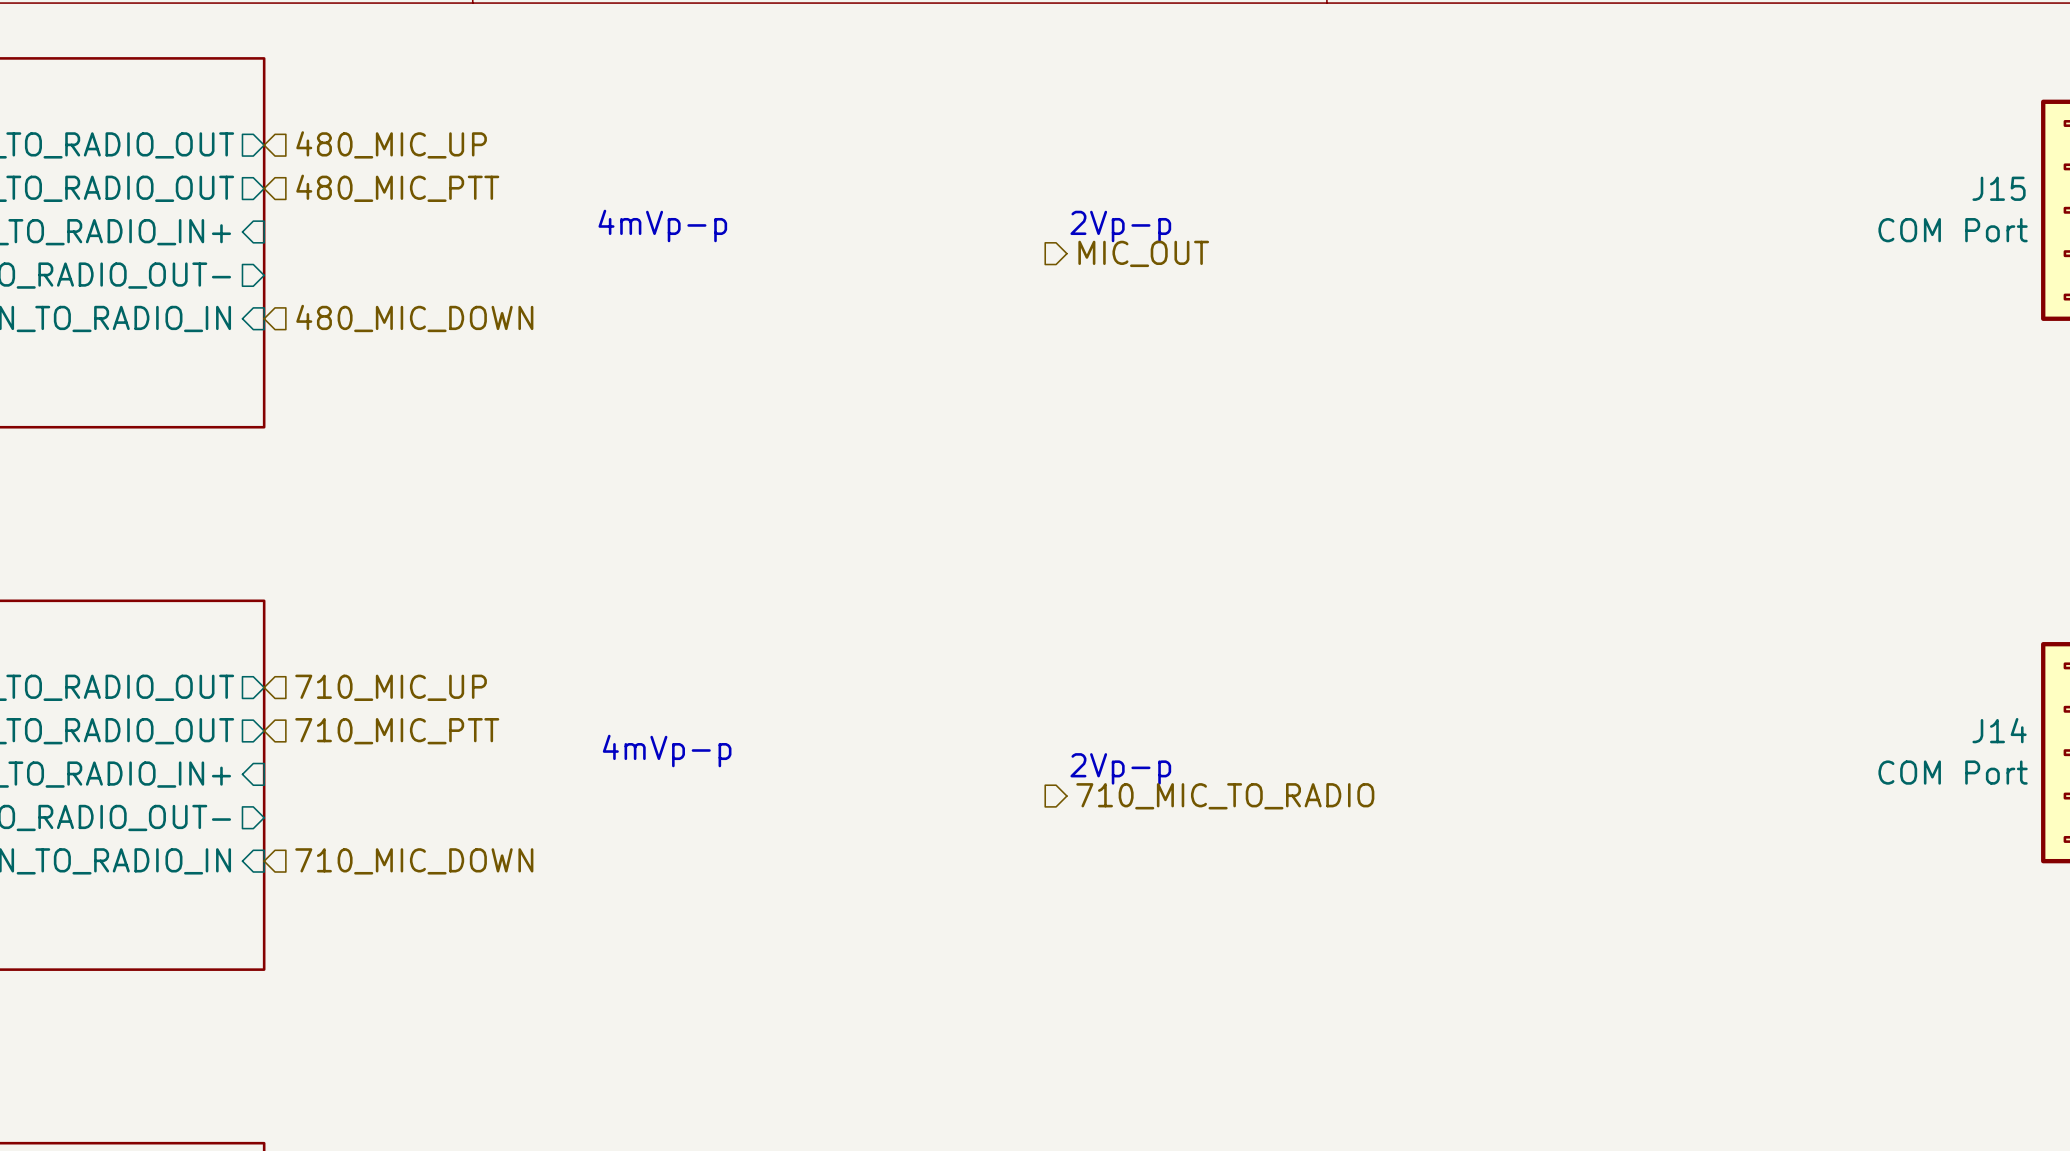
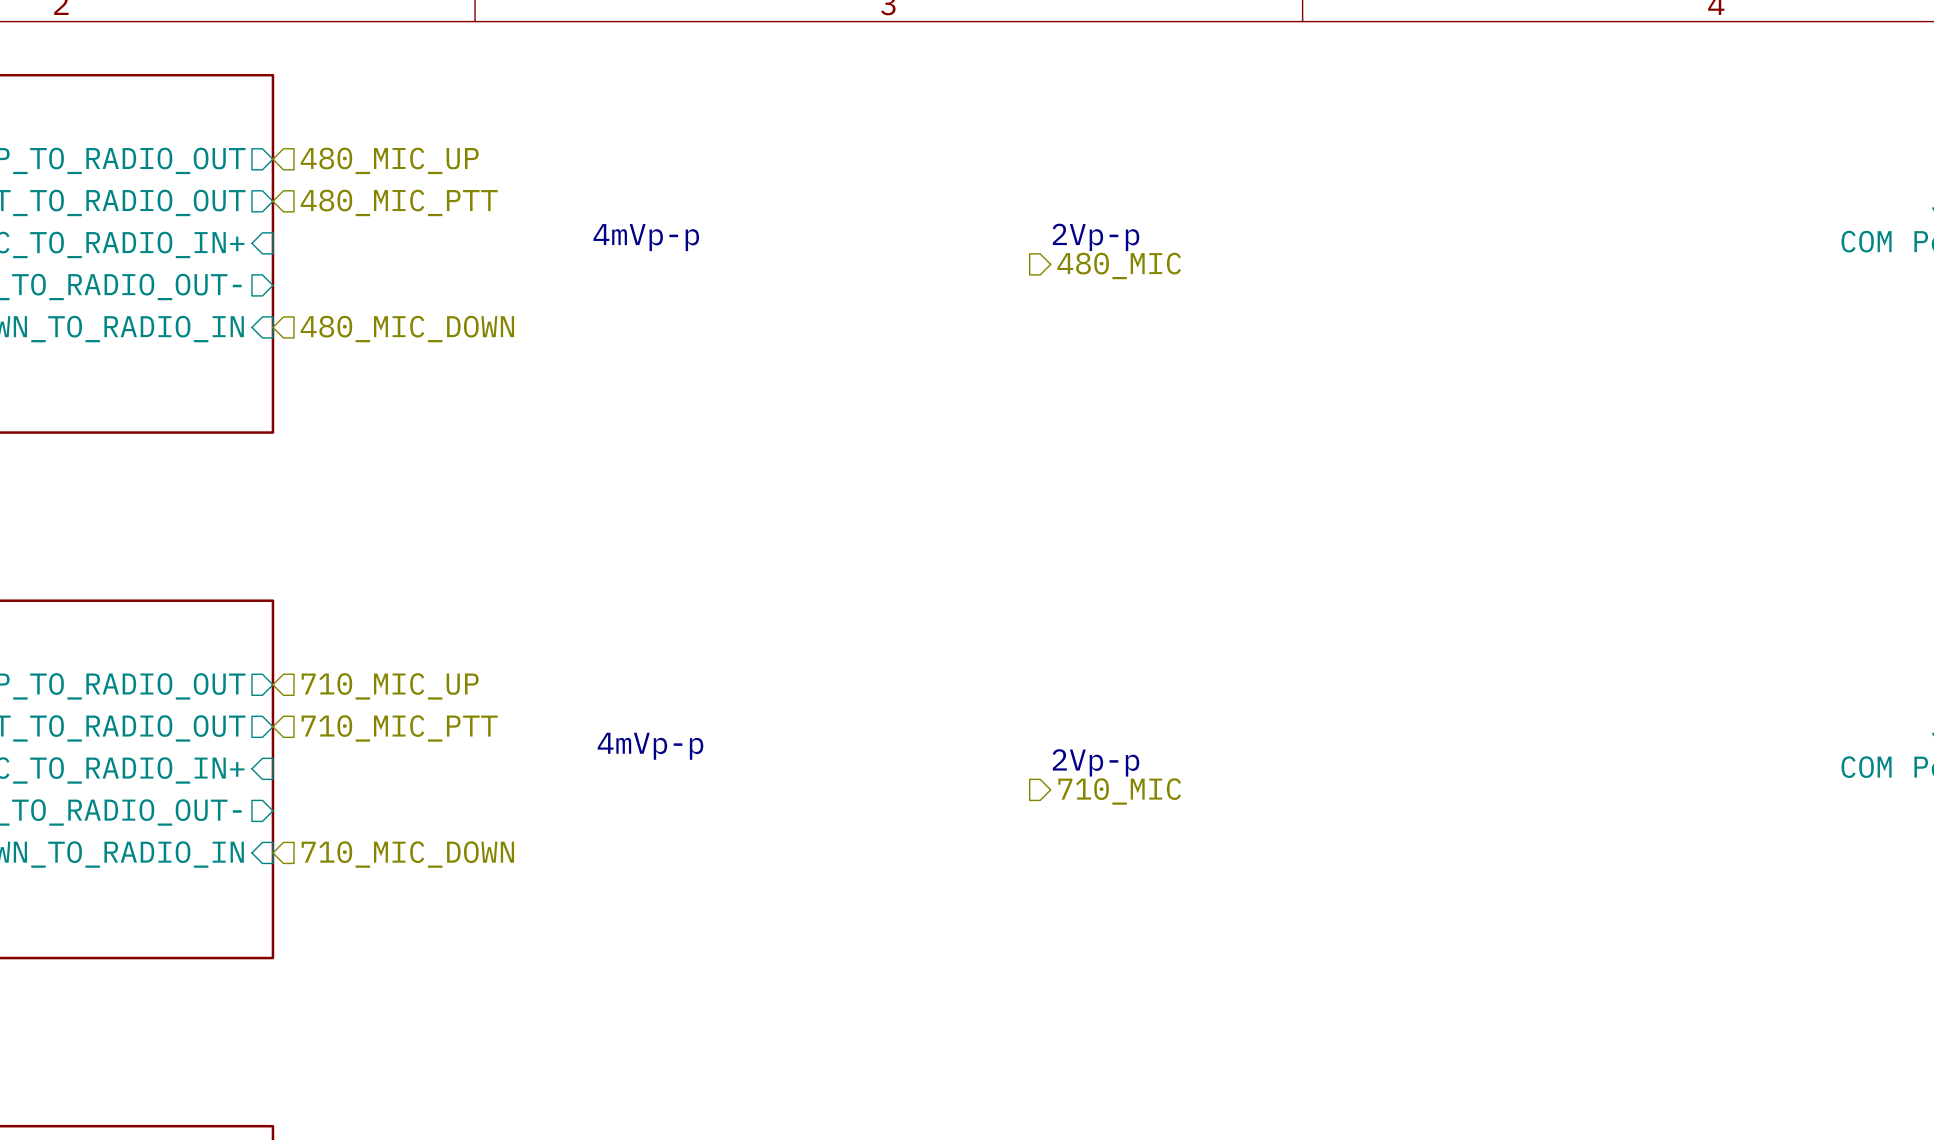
hierarchical label: MIC_OUT (1143, 253) -> 480_MIC (1119, 265)
hierarchical label: 710_MIC_TO_RADIO (1225, 796) -> 710_MIC (1119, 791)

